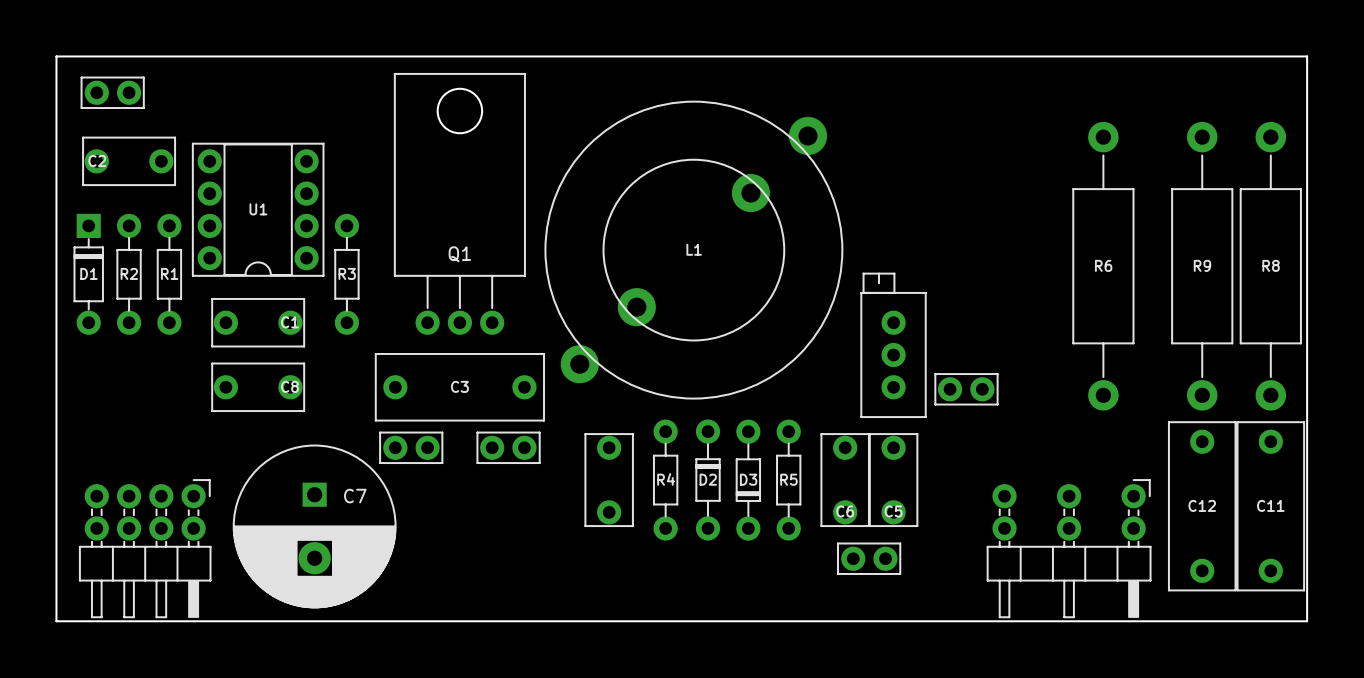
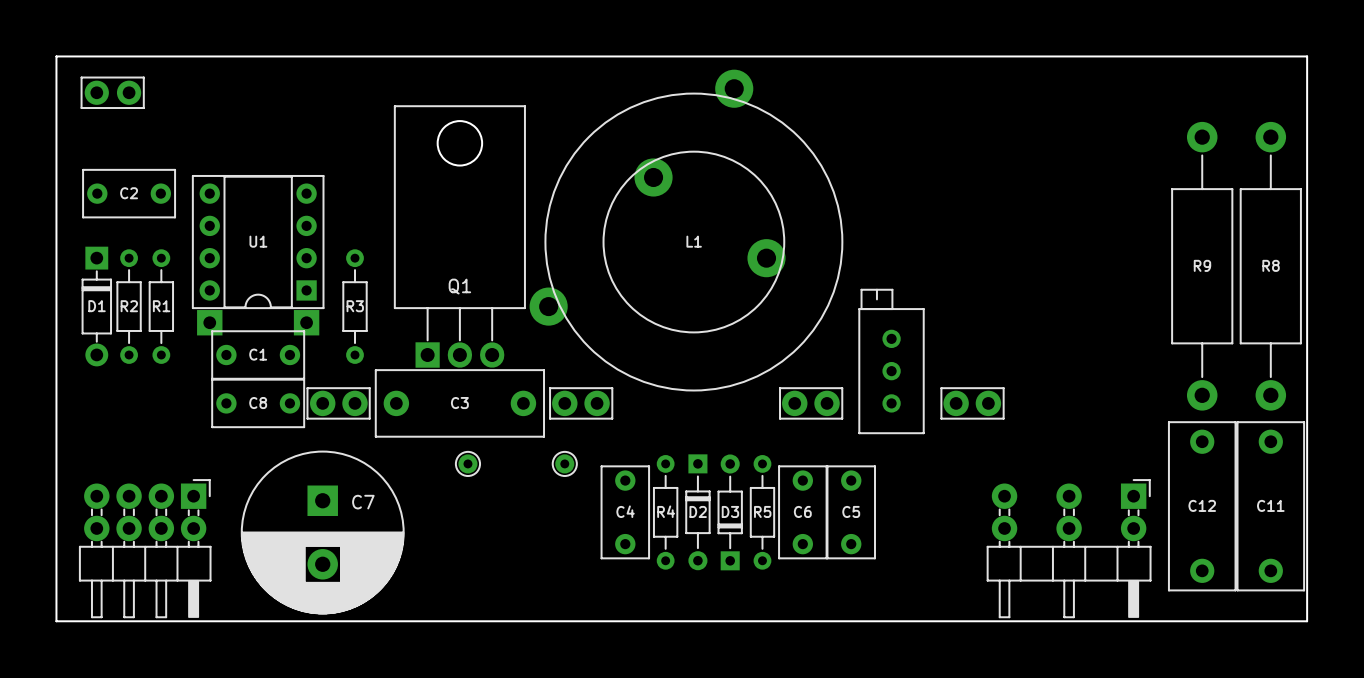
Q1 footprint: [394, 73, 526, 335] -> [394, 105, 526, 368]
L1 footprint: [544, 100, 844, 400] -> [529, 69, 844, 392]
C2 footprint: [82, 136, 176, 186] -> [82, 169, 176, 219]
U1 footprint: [192, 142, 325, 277] -> [192, 175, 325, 309]
C2 name position: C2 (97, 160) -> C2 (129, 193)
D1 footprint: [73, 213, 104, 335] -> [81, 246, 112, 367]
R2 footprint: [116, 213, 142, 335] -> [116, 249, 142, 364]
R1 footprint: [156, 213, 182, 335] -> [148, 249, 174, 364]
R3 footprint: [334, 213, 360, 335] -> [342, 249, 368, 364]
R6: (1103, 266) -> none
C1 footprint: [211, 298, 305, 348] -> [211, 330, 305, 380]
part: none -> (209, 322)
C1 name position: C1 (289, 322) -> C1 (258, 354)
part: none -> (306, 322)
part: (893, 345) -> none
C3 footprint: [375, 353, 545, 422] -> [375, 369, 545, 438]
part: none -> (891, 361)
C8 footprint: [211, 362, 305, 412] -> [211, 378, 305, 428]
C8 name position: C8 (289, 386) -> C8 (258, 403)
part: (966, 389) -> none
part: none -> (338, 403)
part: none -> (581, 403)
part: none -> (811, 403)
part: none -> (972, 403)
R4 footprint: [653, 419, 679, 541] -> [653, 455, 679, 570]
D2 footprint: [695, 419, 721, 541] -> [685, 454, 711, 571]
D3 footprint: [735, 419, 761, 541] -> [717, 454, 743, 571]
R5 footprint: [776, 419, 802, 541] -> [750, 455, 775, 570]
C6 footprint: [820, 433, 870, 527] -> [778, 465, 828, 560]
C5 footprint: [869, 433, 919, 527] -> [826, 465, 876, 560]
C7 footprint: [232, 444, 397, 609] -> [241, 450, 405, 615]
part: (411, 447) -> none
part: (508, 447) -> none
part: none -> (467, 463)
part: none -> (564, 463)
part footprint: [79, 479, 212, 619] -> [79, 479, 212, 619]
part footprint: [986, 479, 1152, 619] -> [986, 479, 1152, 619]
part: (609, 480) -> none
C6 name position: C6 (845, 511) -> C6 (802, 511)
C5 name position: C5 (893, 511) -> C5 (851, 511)
C4: none -> (625, 512)
part: (869, 558) -> none

